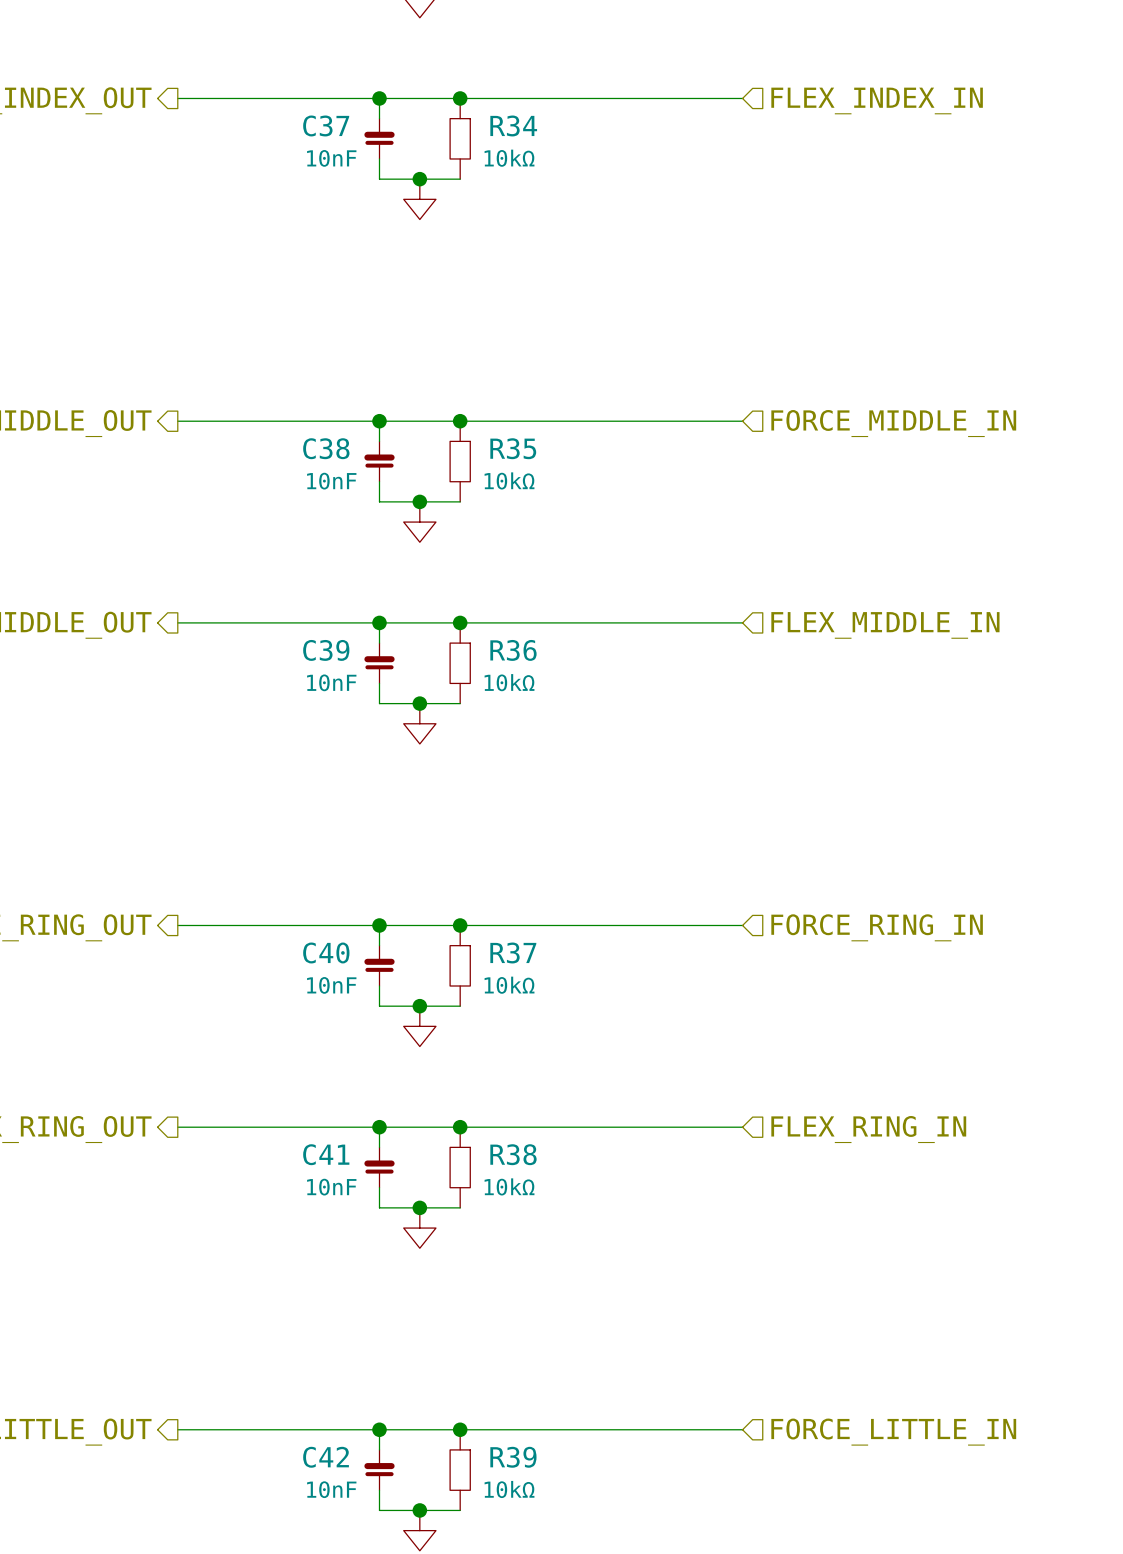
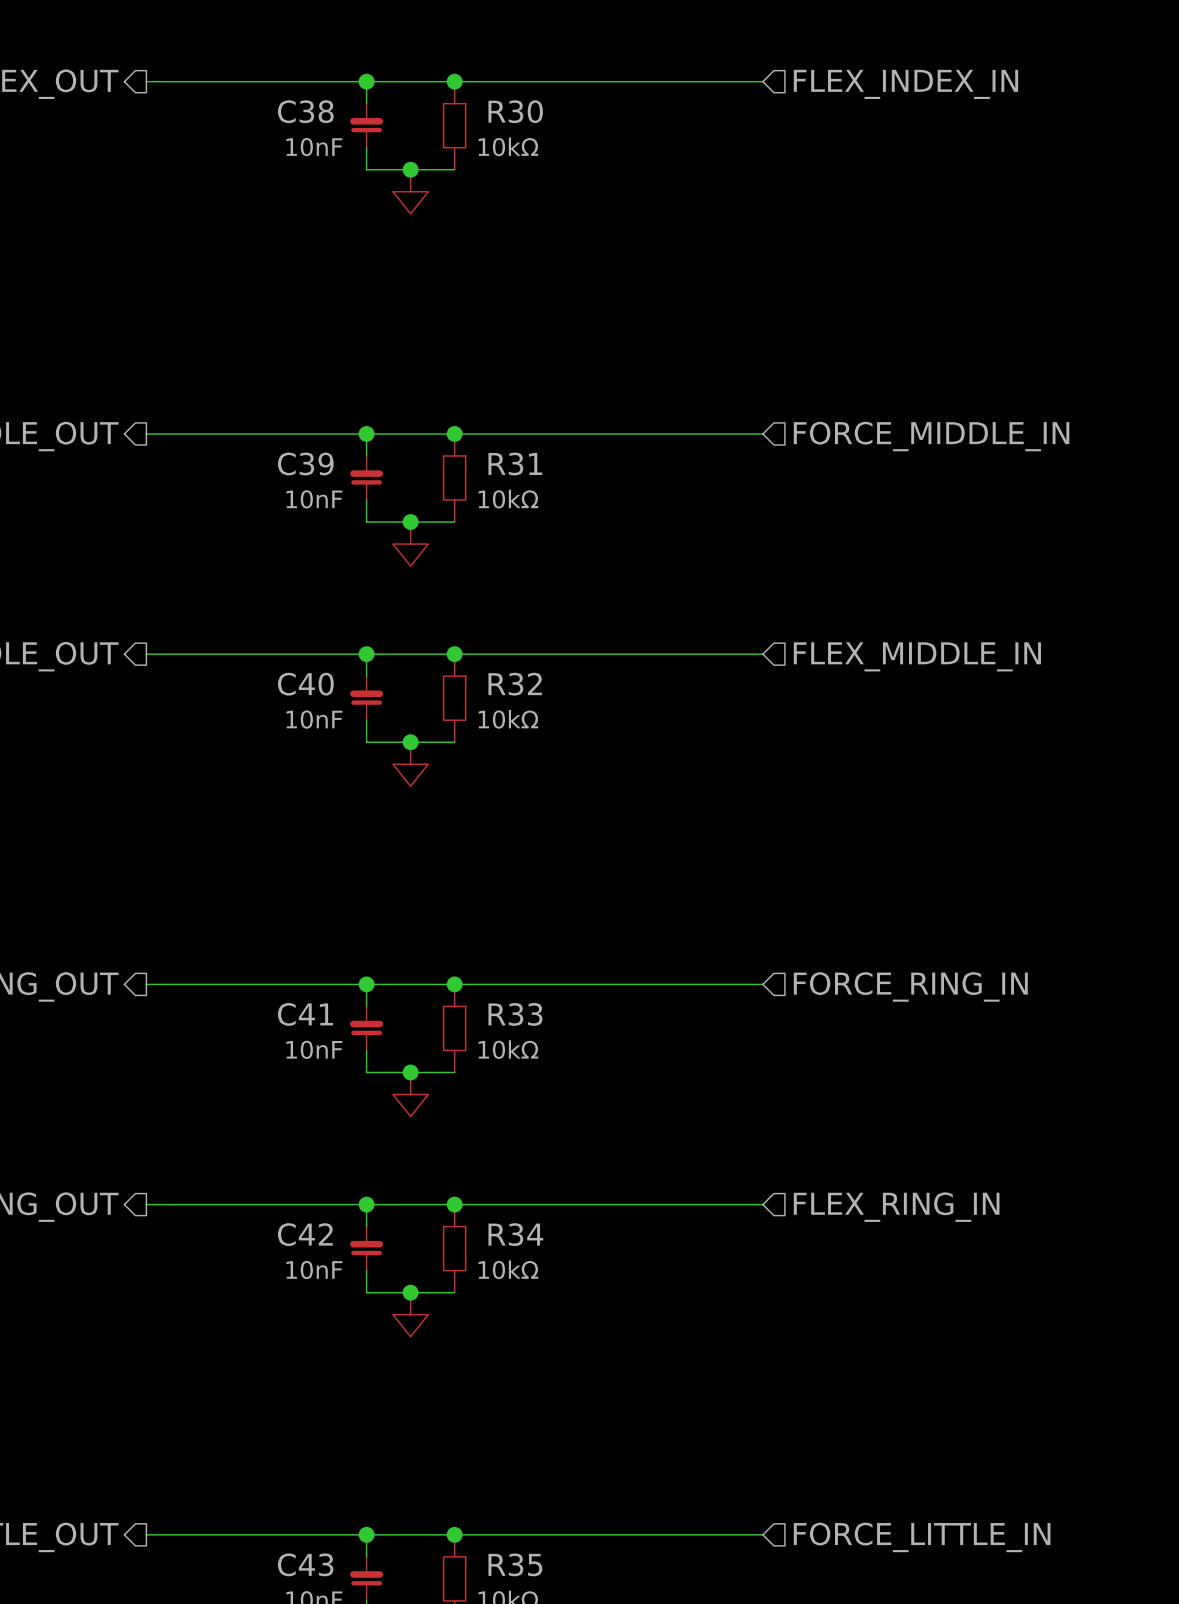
C37 name: C37 (326, 125) -> C38 (305, 111)
R34 name: R34 (513, 125) -> R30 (515, 111)
C38 name: C38 (326, 448) -> C39 (305, 463)
R35 name: R35 (513, 448) -> R31 (515, 463)
C39 name: C39 (326, 650) -> C40 (305, 684)
R36 name: R36 (513, 650) -> R32 (515, 684)
C40 name: C40 (326, 952) -> C41 (305, 1014)
R37 name: R37 (513, 952) -> R33 (515, 1014)
C41 name: C41 (326, 1154) -> C42 (305, 1234)
R38 name: R38 (513, 1154) -> R34 (515, 1234)
C42 name: C42 (326, 1457) -> C43 (305, 1564)
R39 name: R39 (513, 1457) -> R35 (515, 1564)

